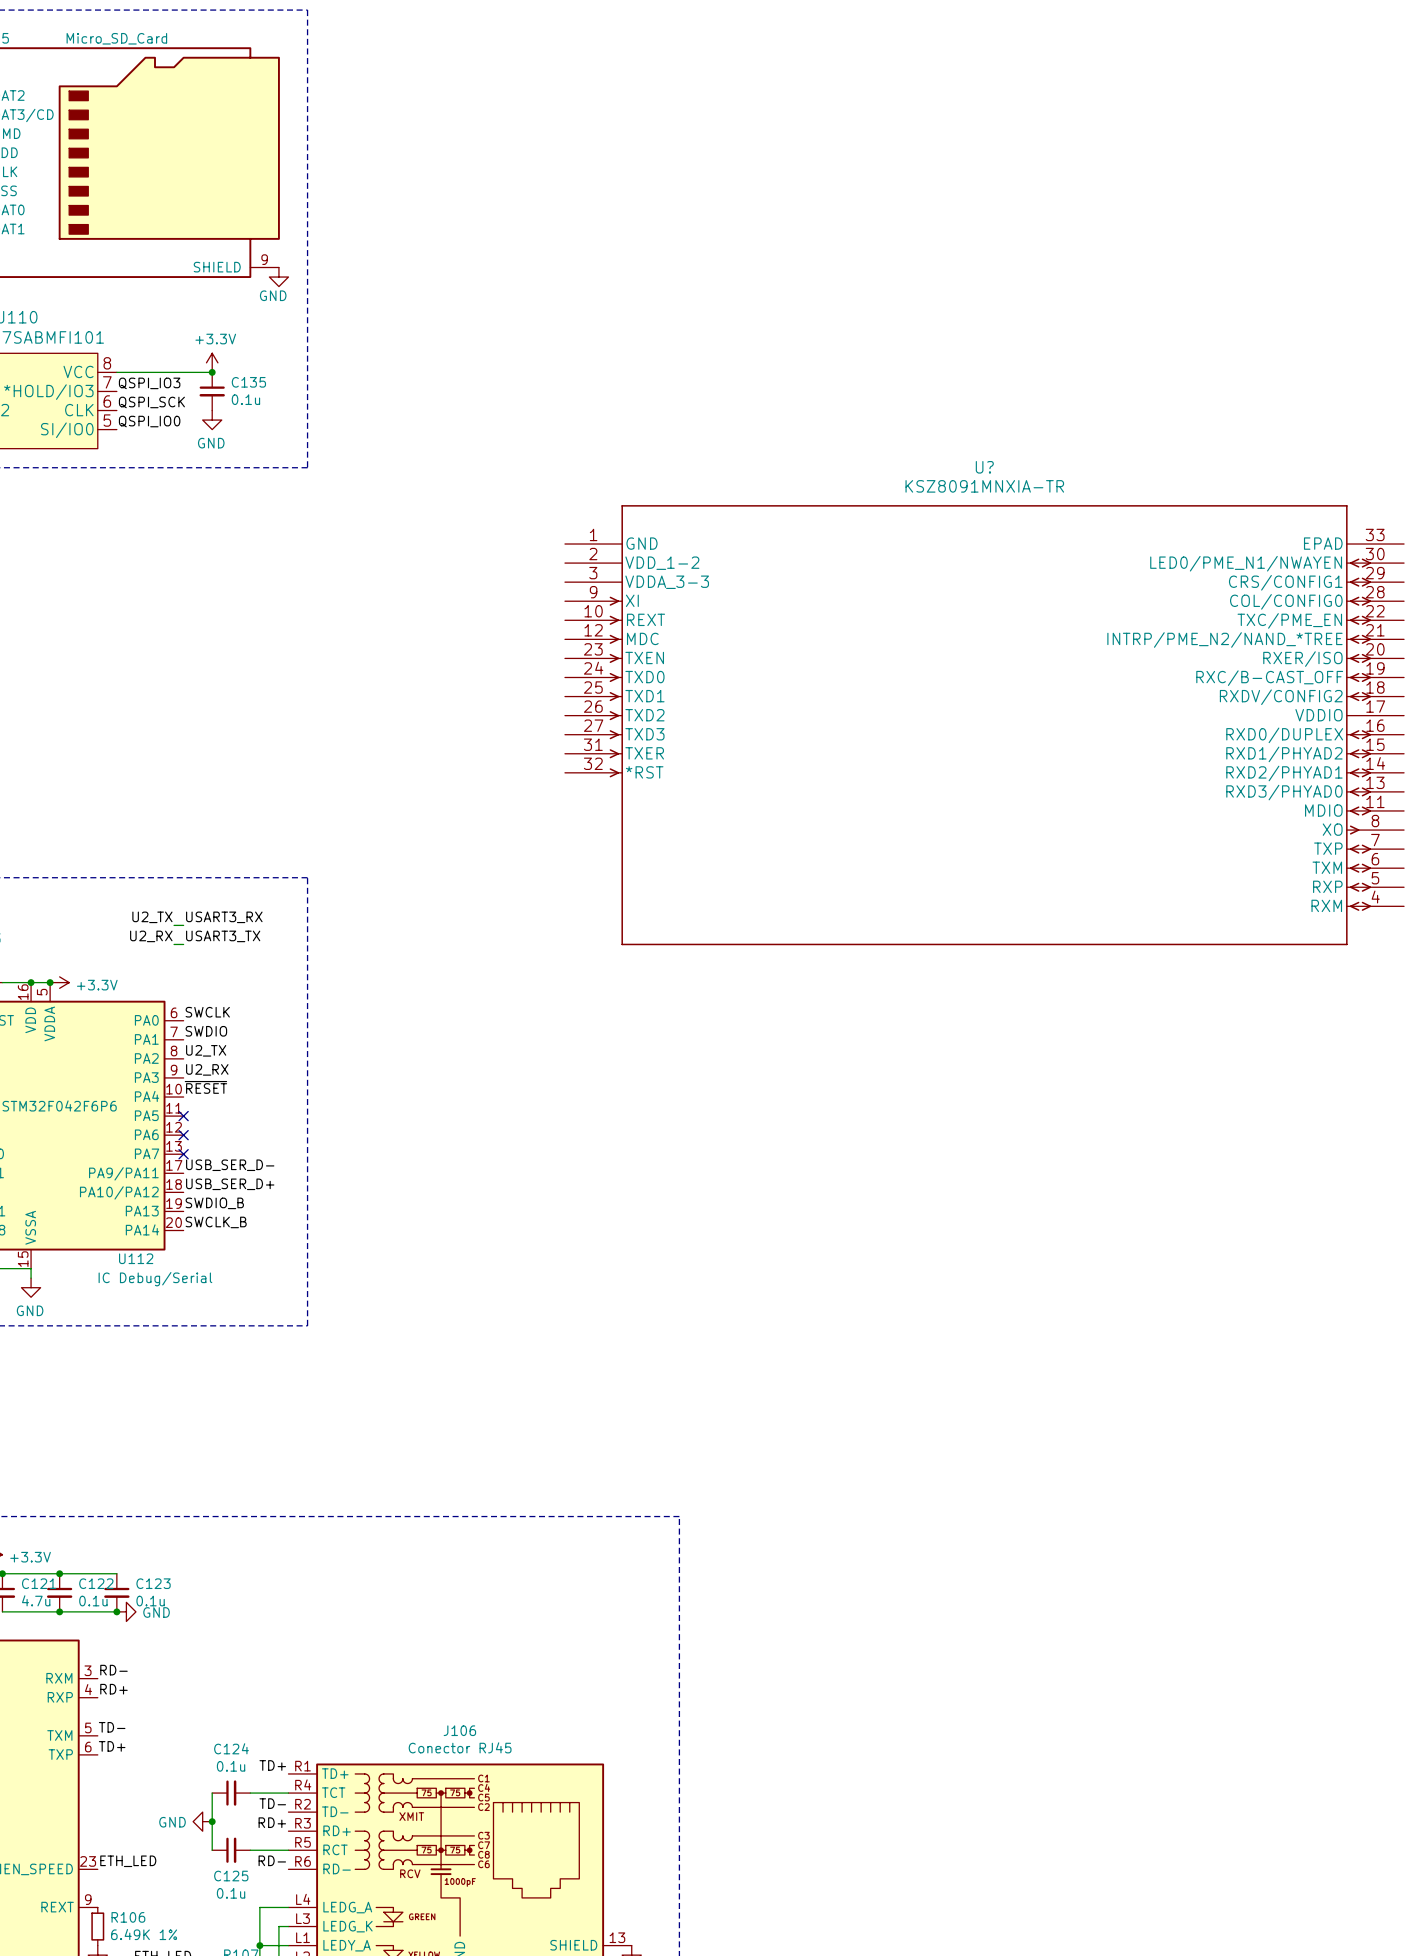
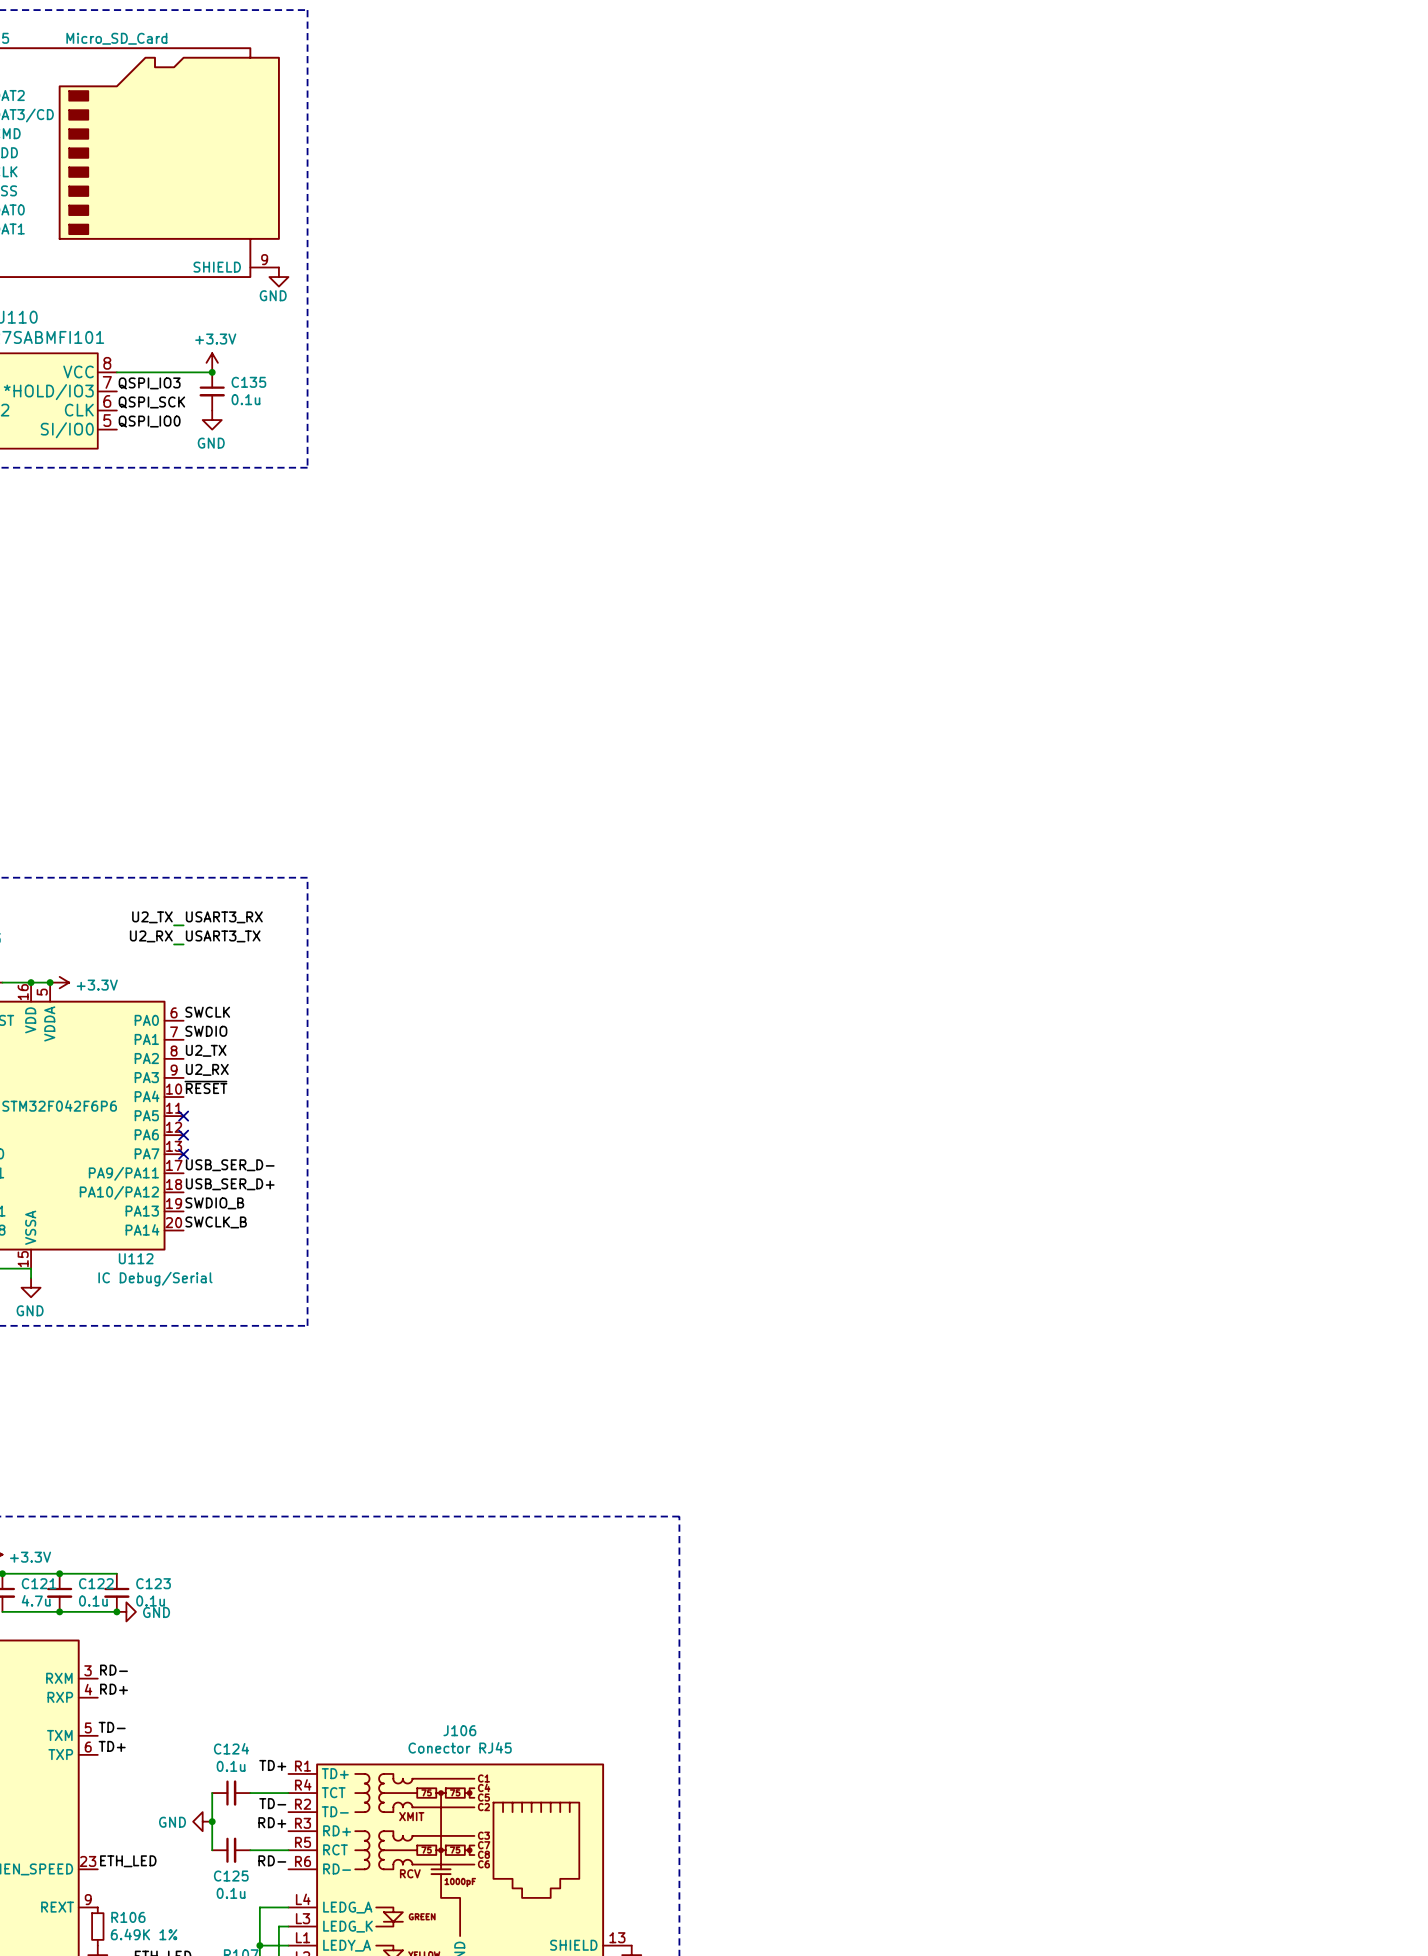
U?: KSZ8091MNXIA-TR (984, 725) -> none

